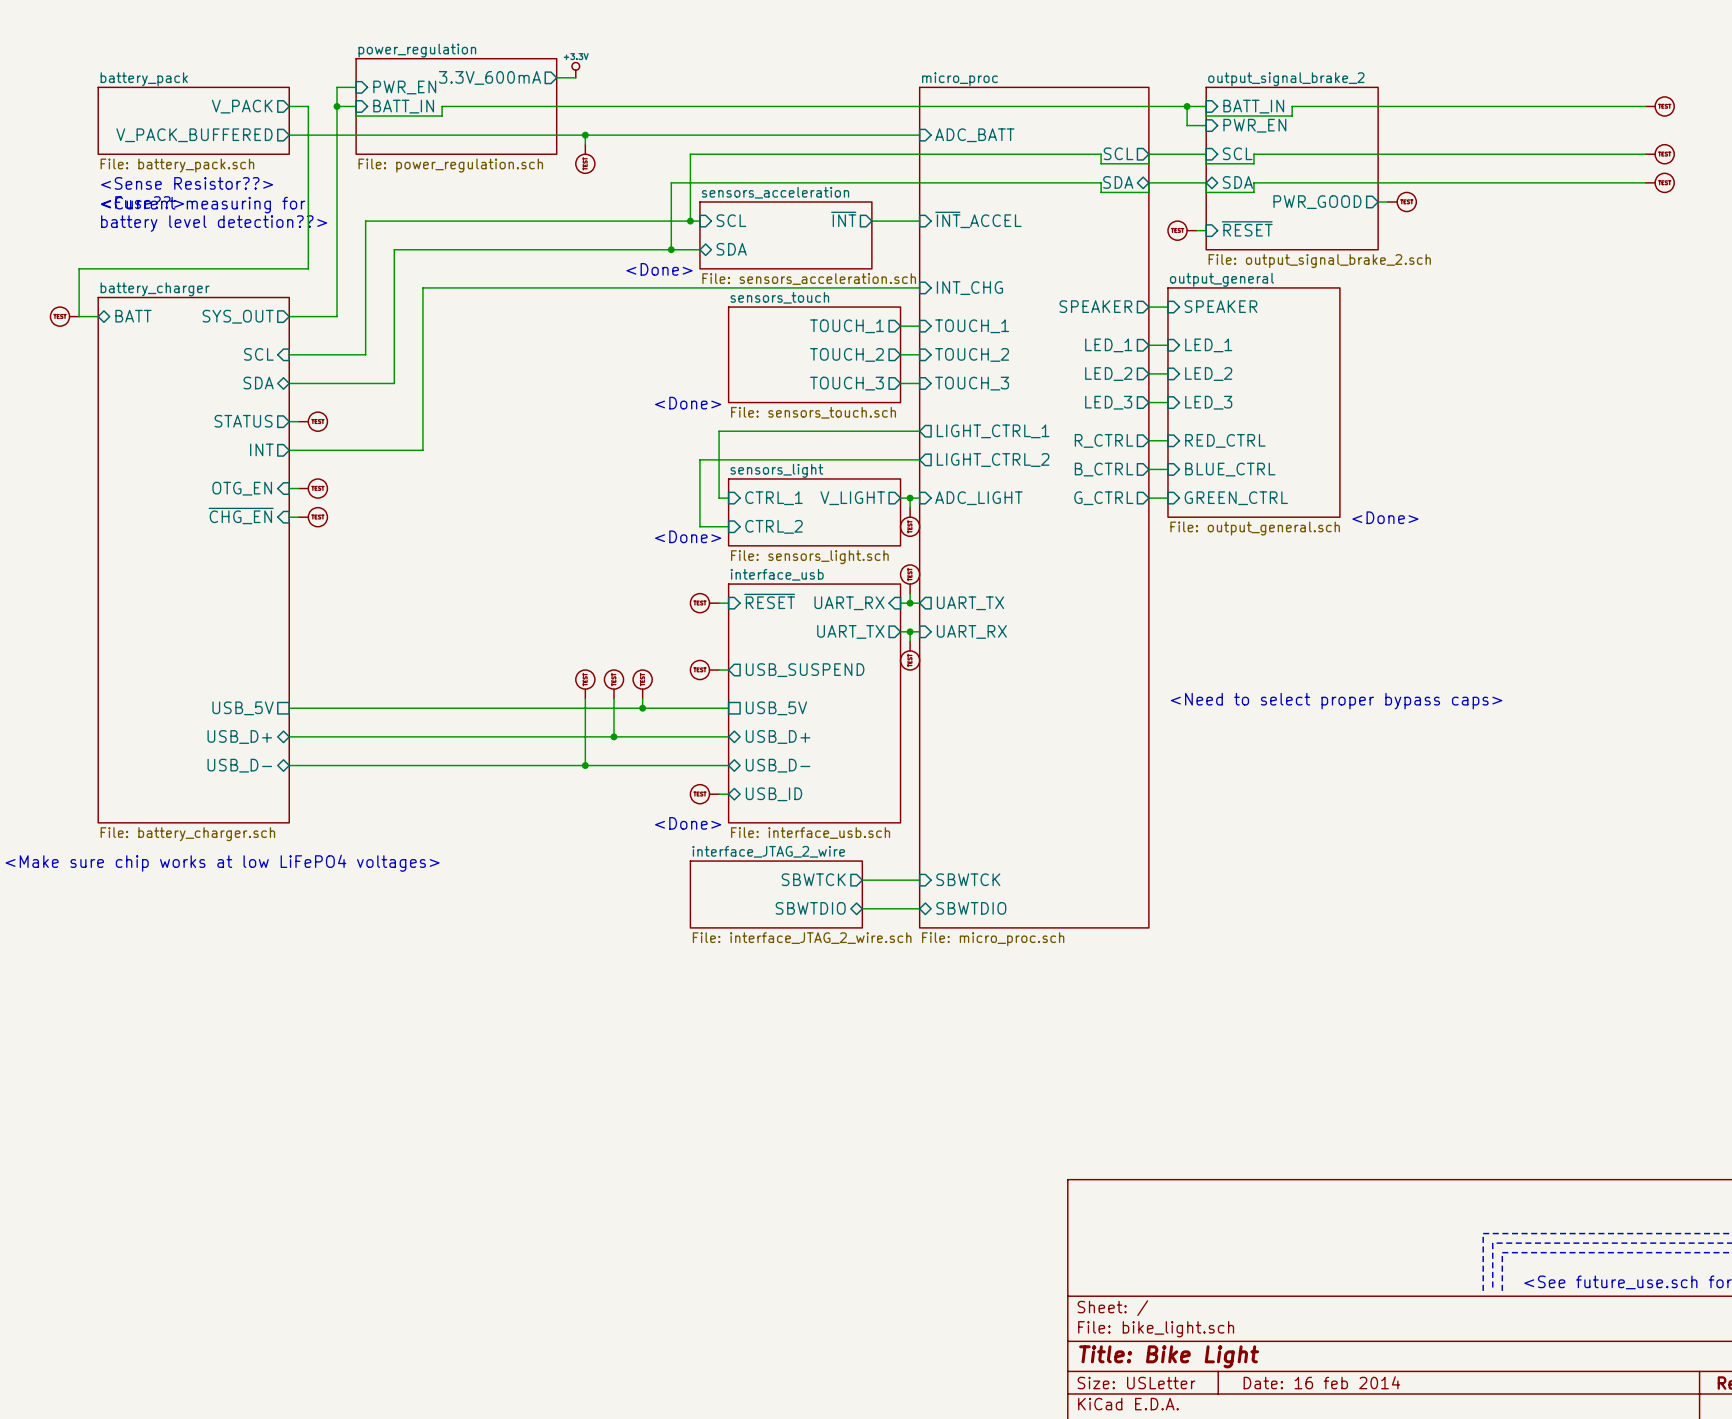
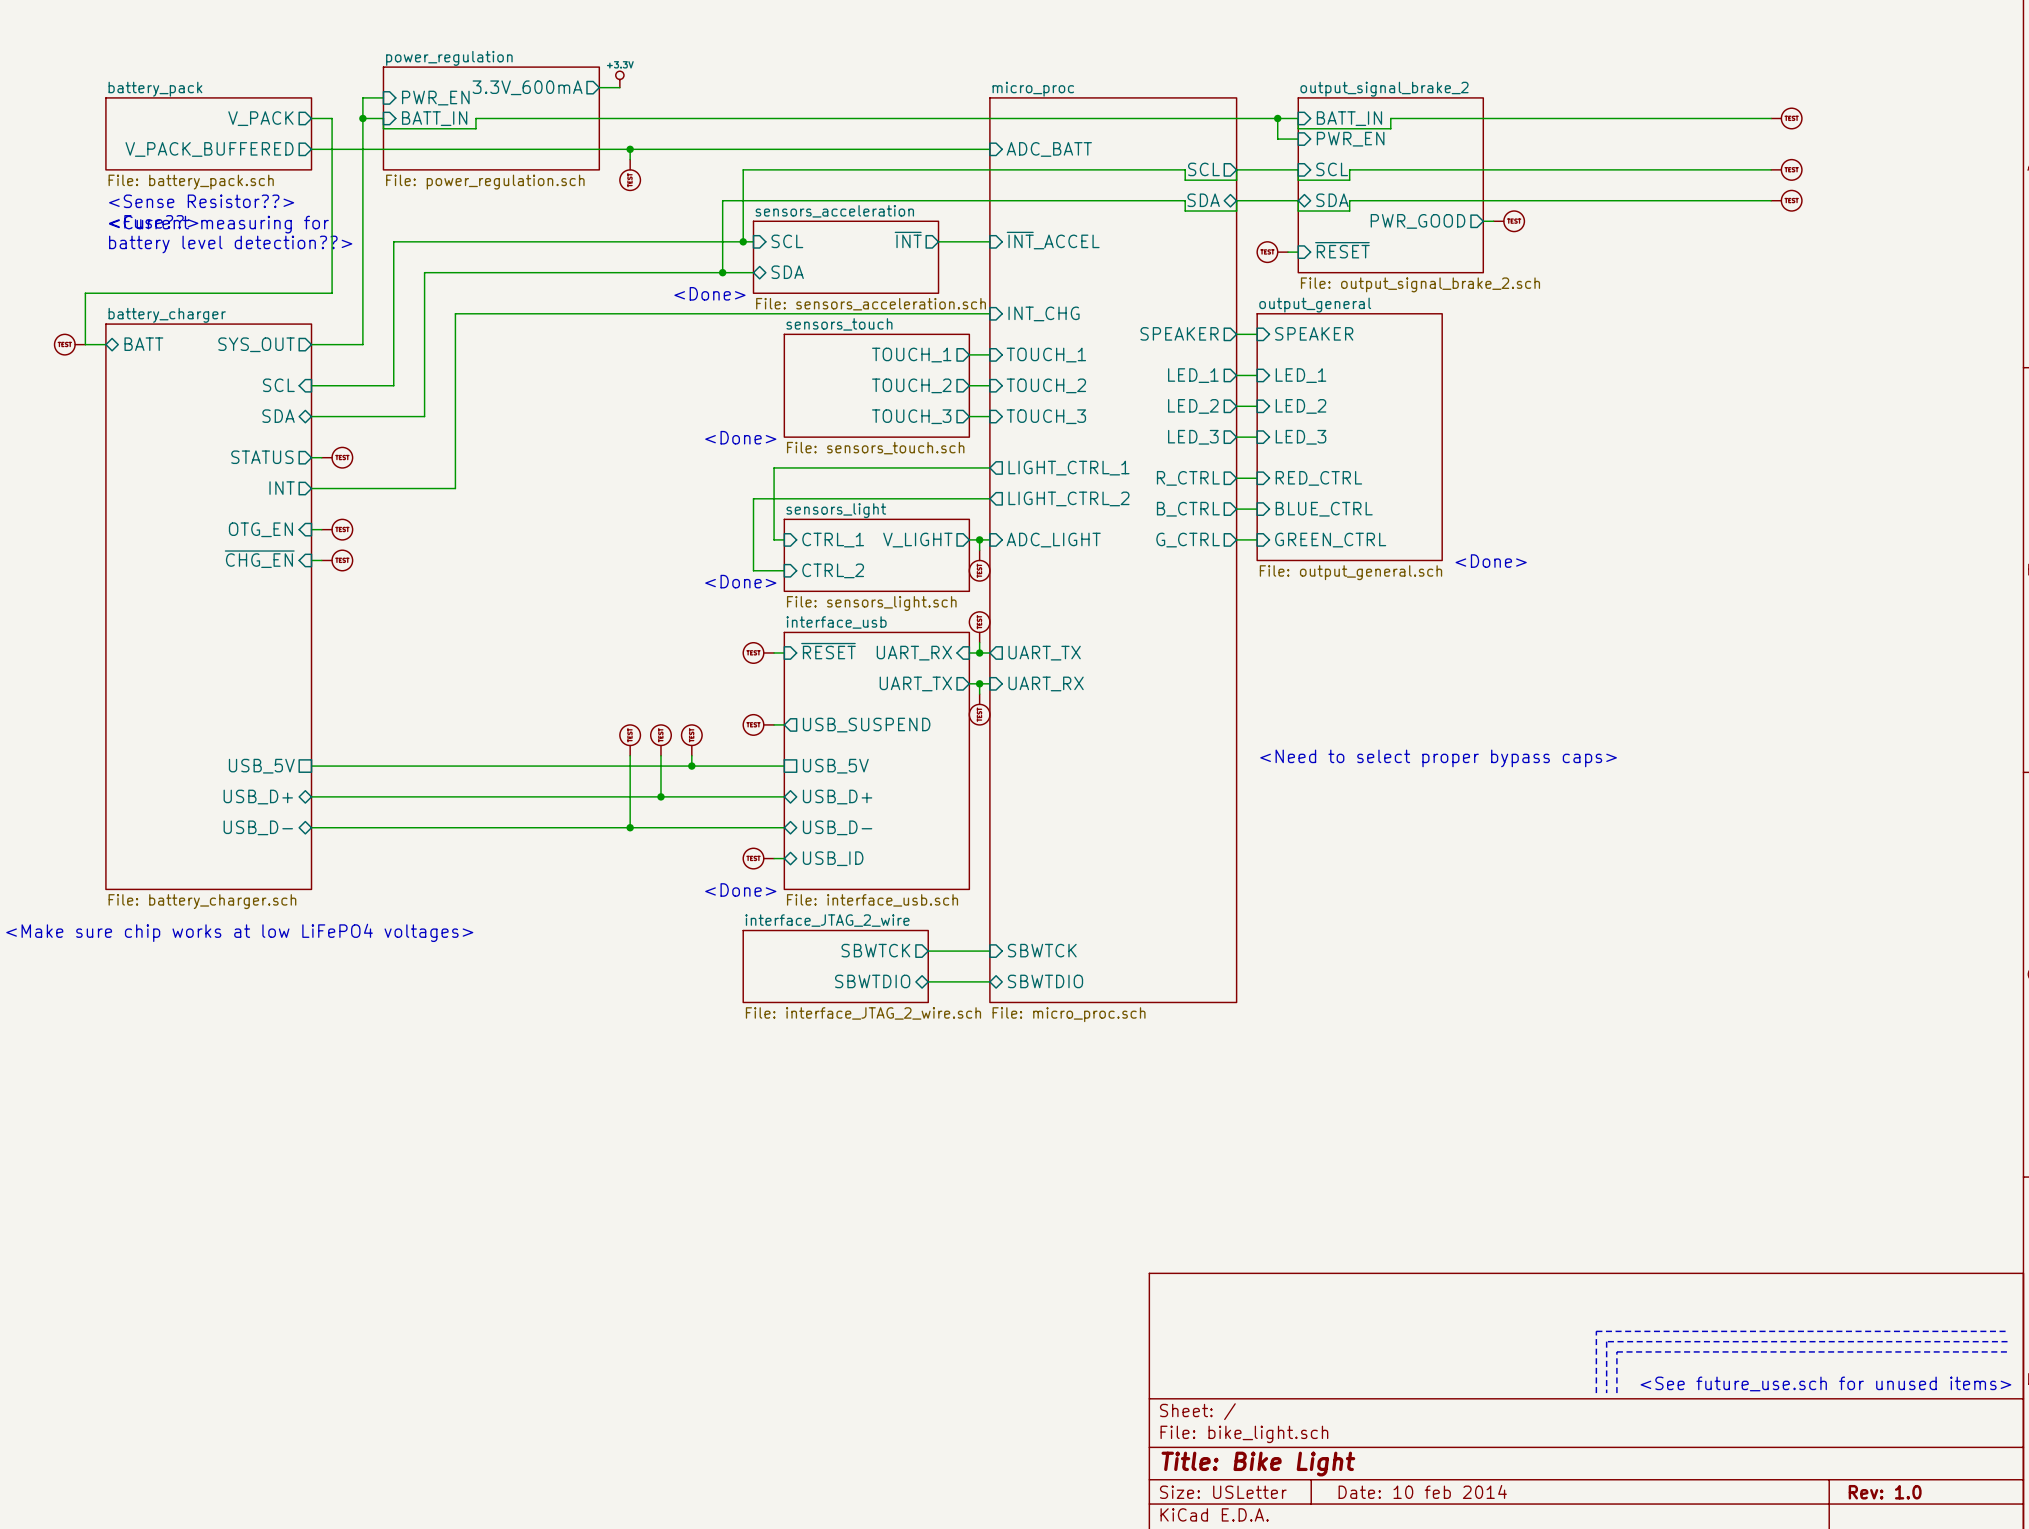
title block: Date: 16 feb 2014 (1321, 1382) -> Date: 10 feb 2014 (1422, 1491)

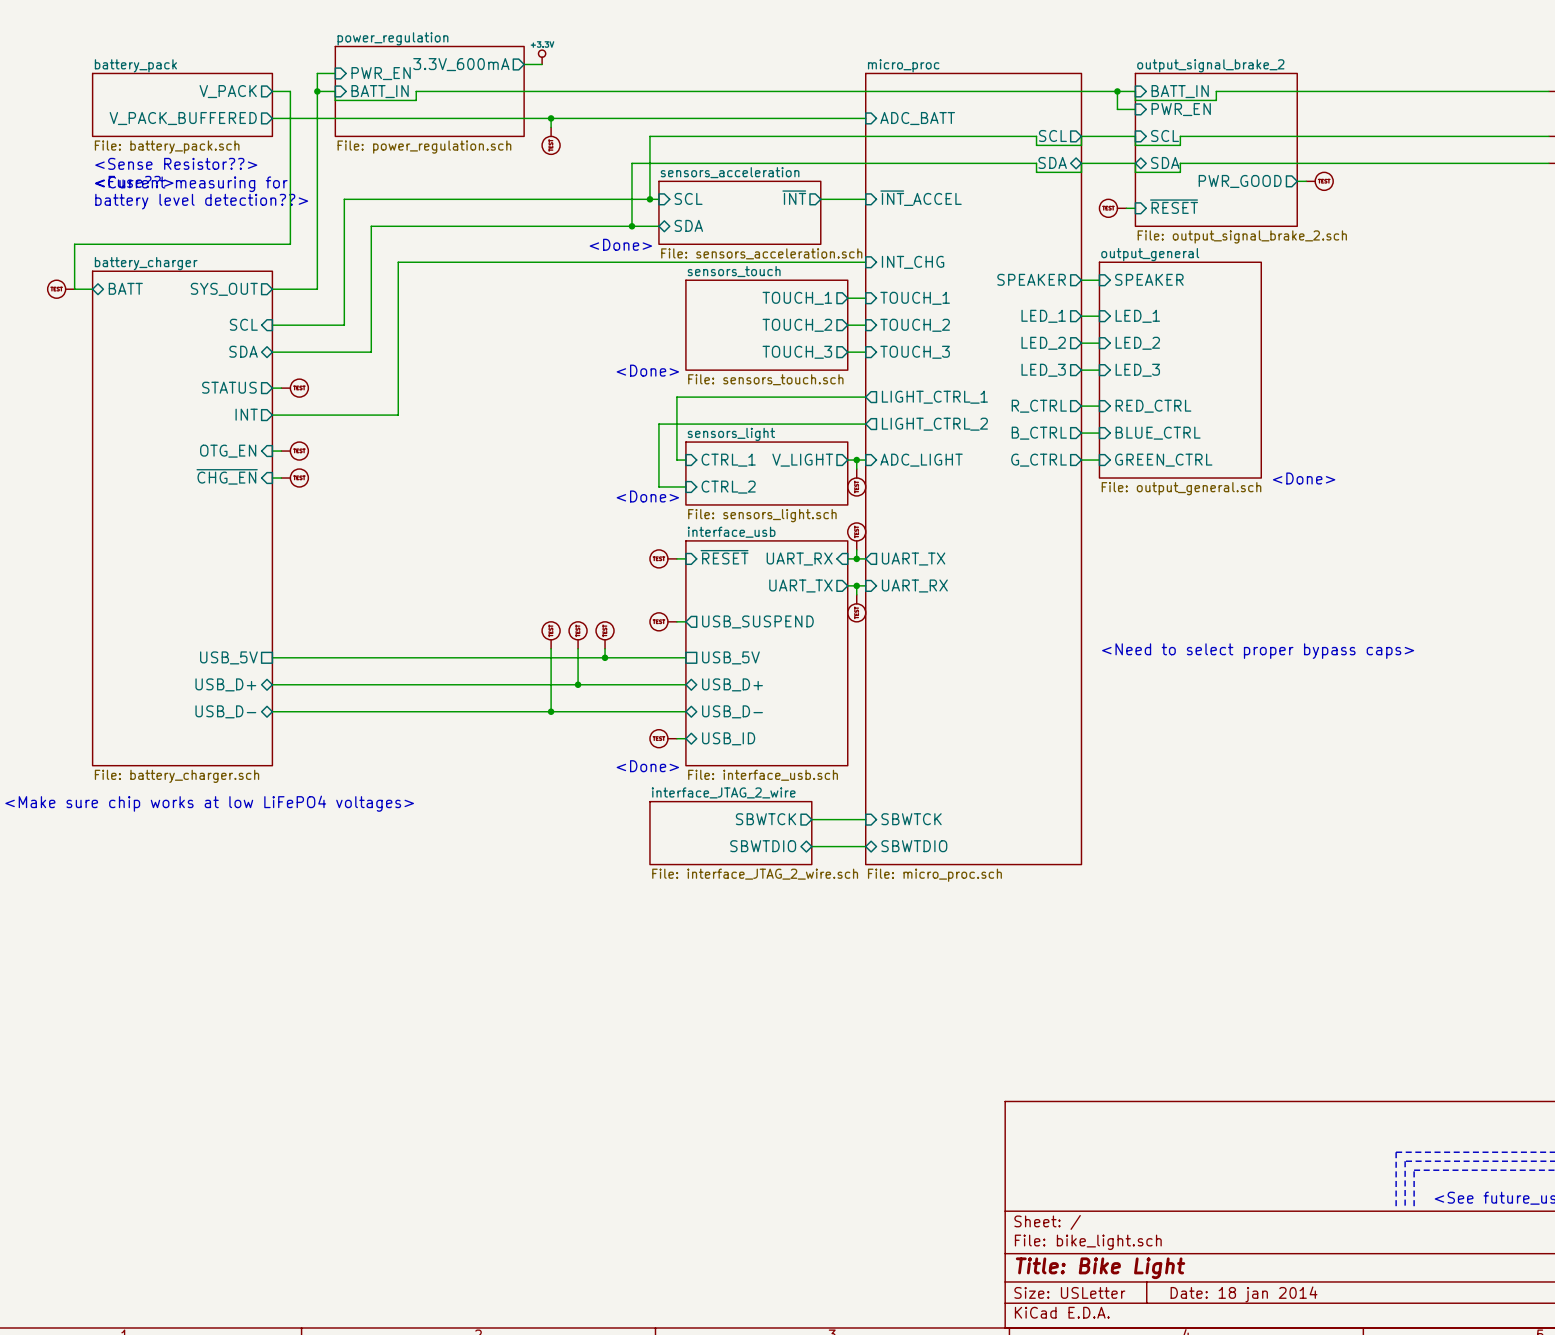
title block: Date: 10 feb 2014 (1422, 1491) -> Date: 18 jan 2014 (1244, 1294)

